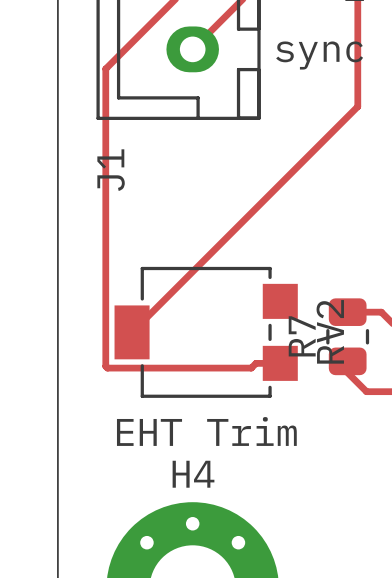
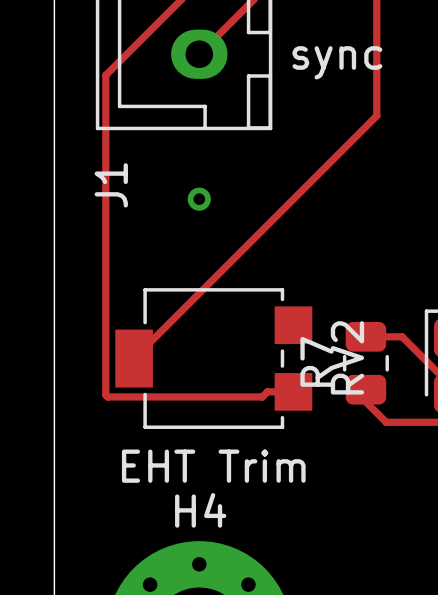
via: none -> (199, 199)

